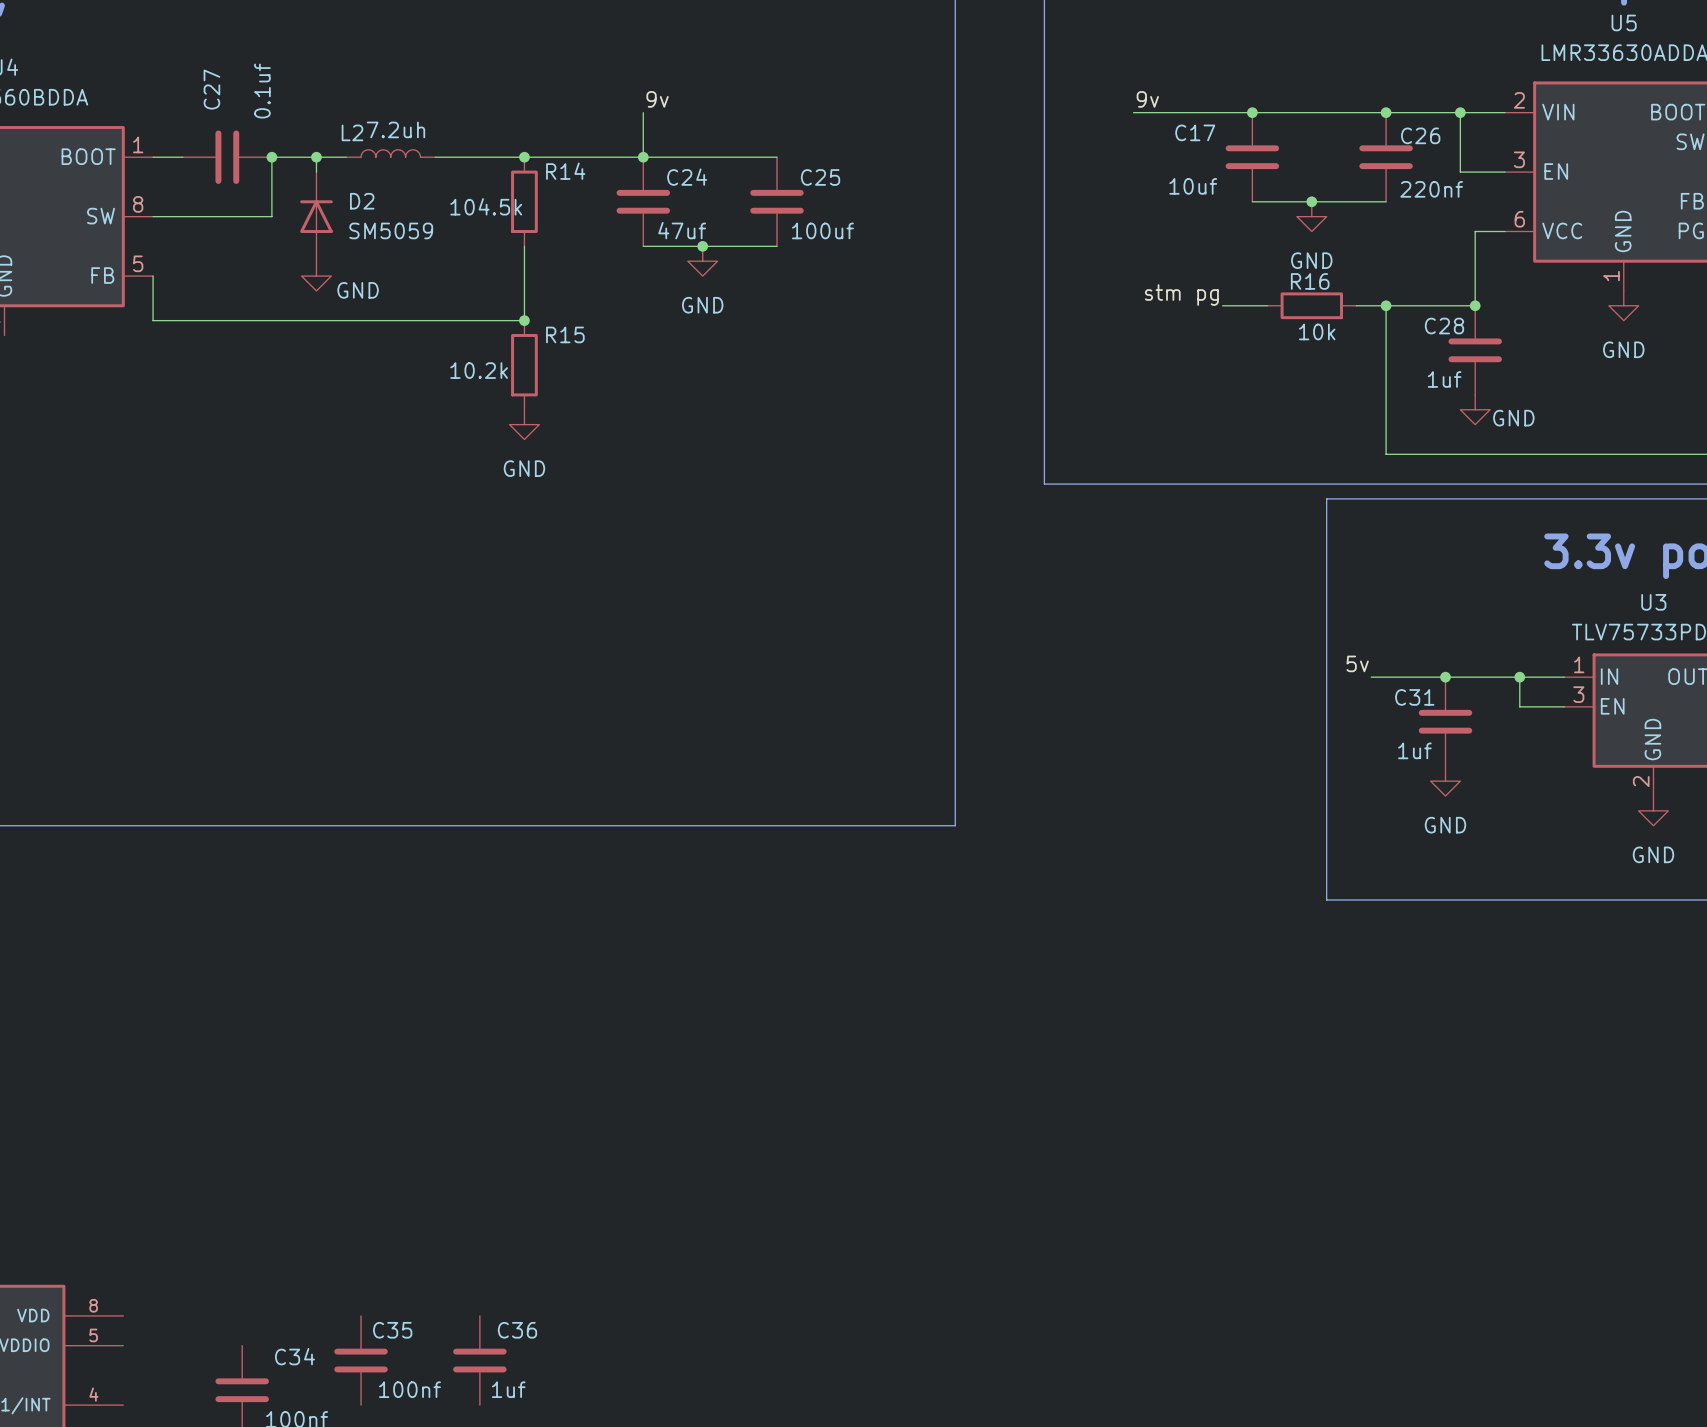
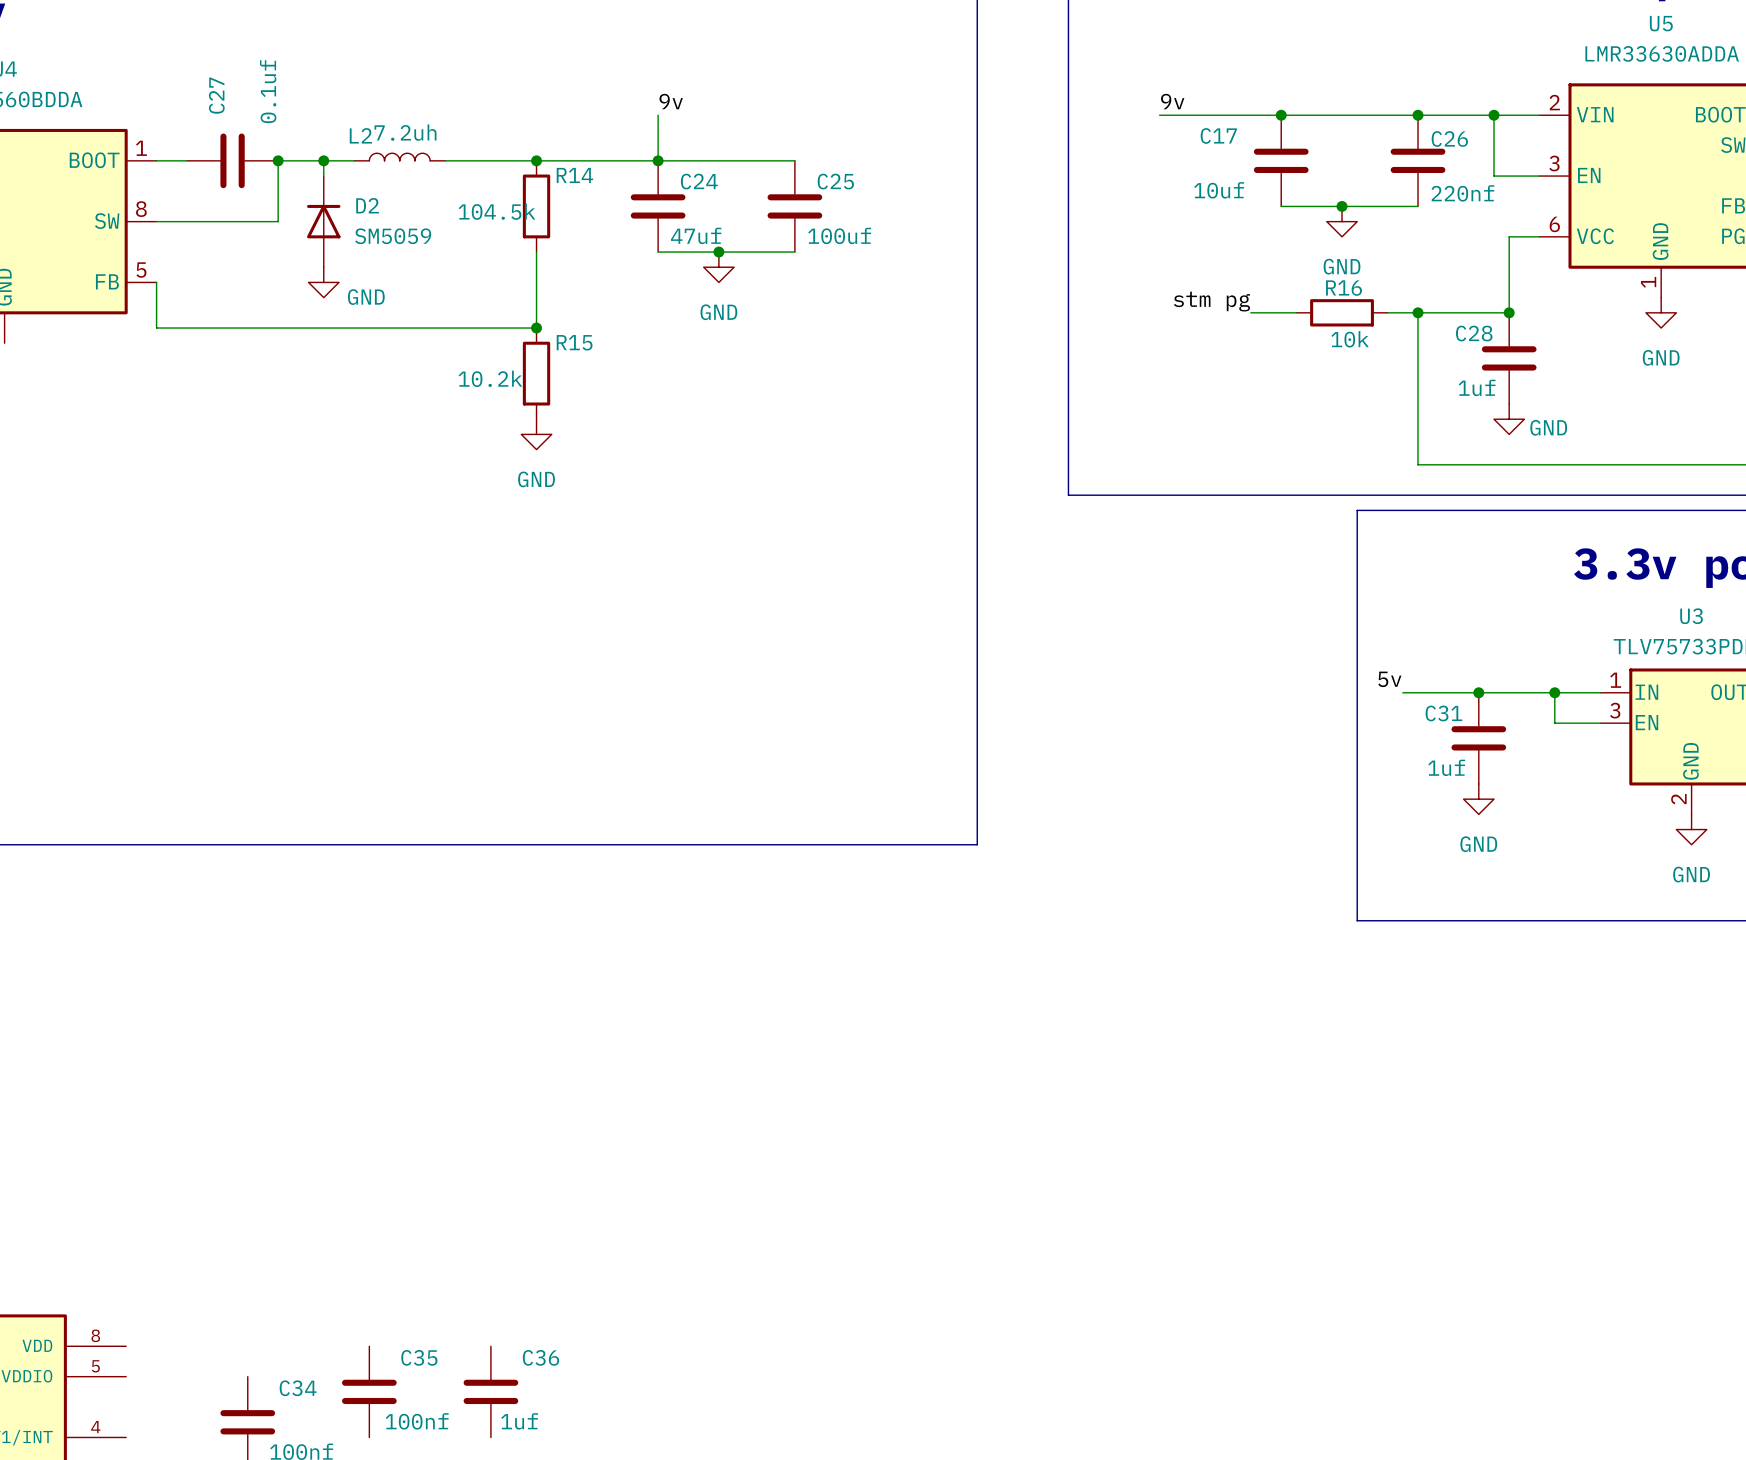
C35 name position: C35 (392, 1330) -> C35 (419, 1357)
C36 name position: C36 (517, 1330) -> C36 (540, 1357)

